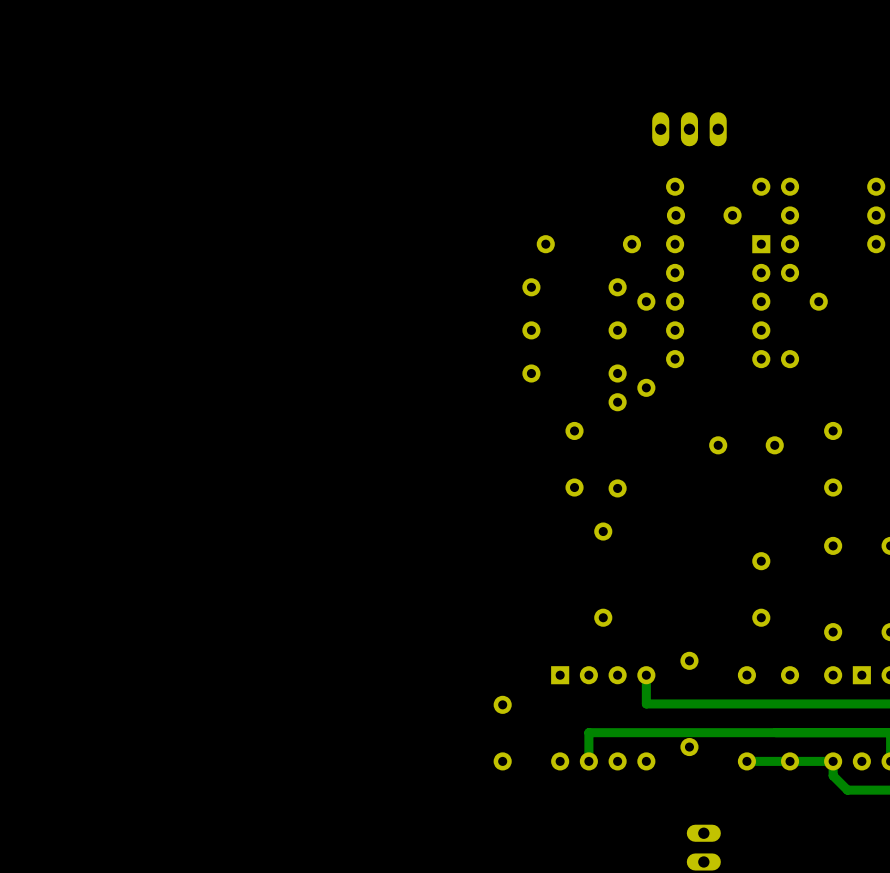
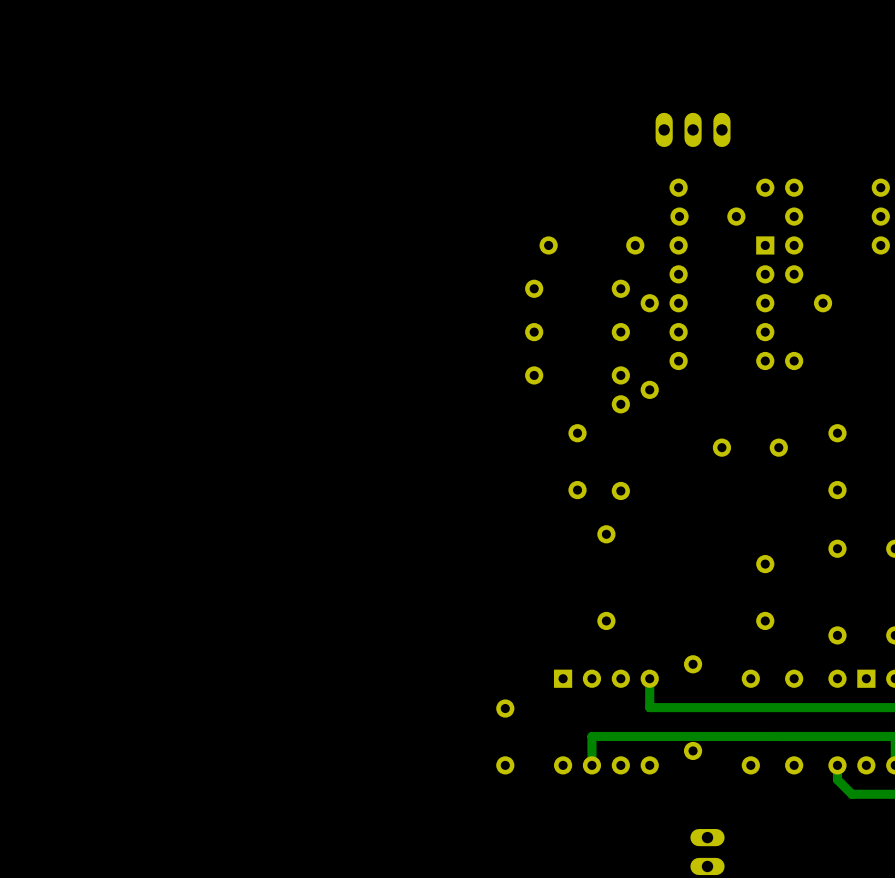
track: (833, 761) (746, 761) -> none

